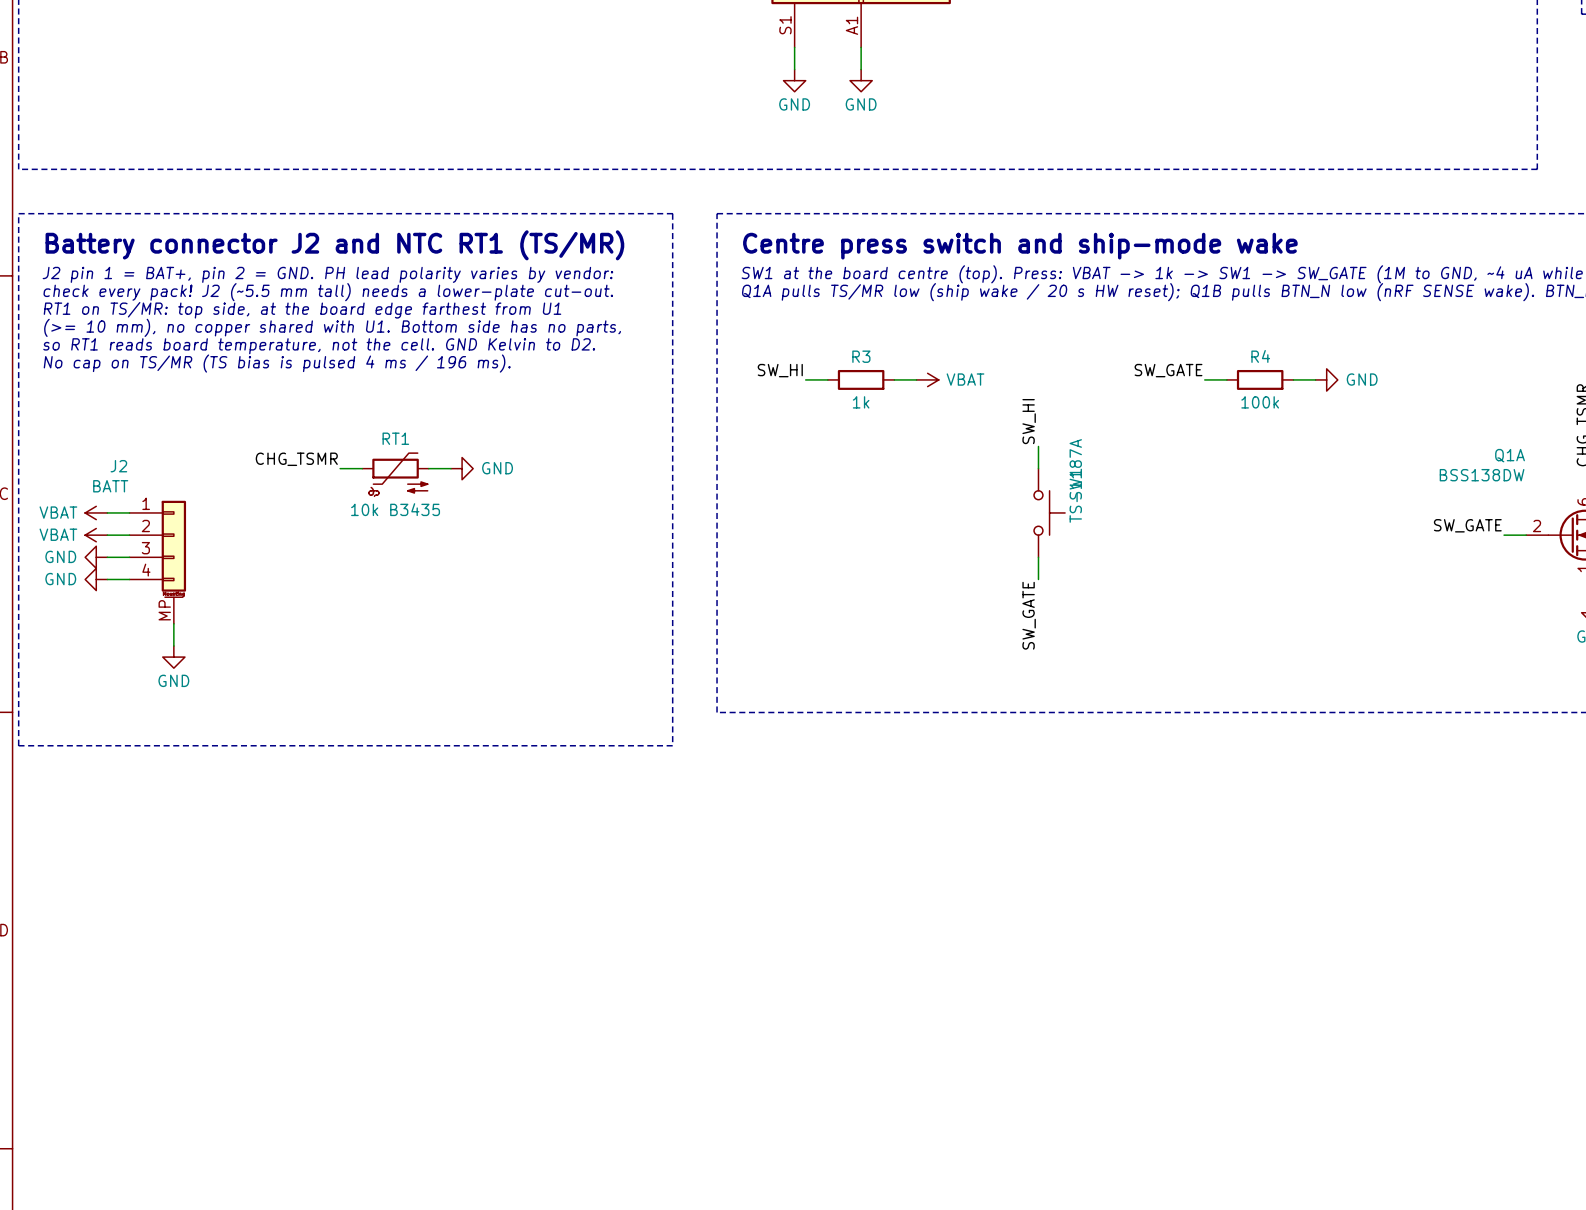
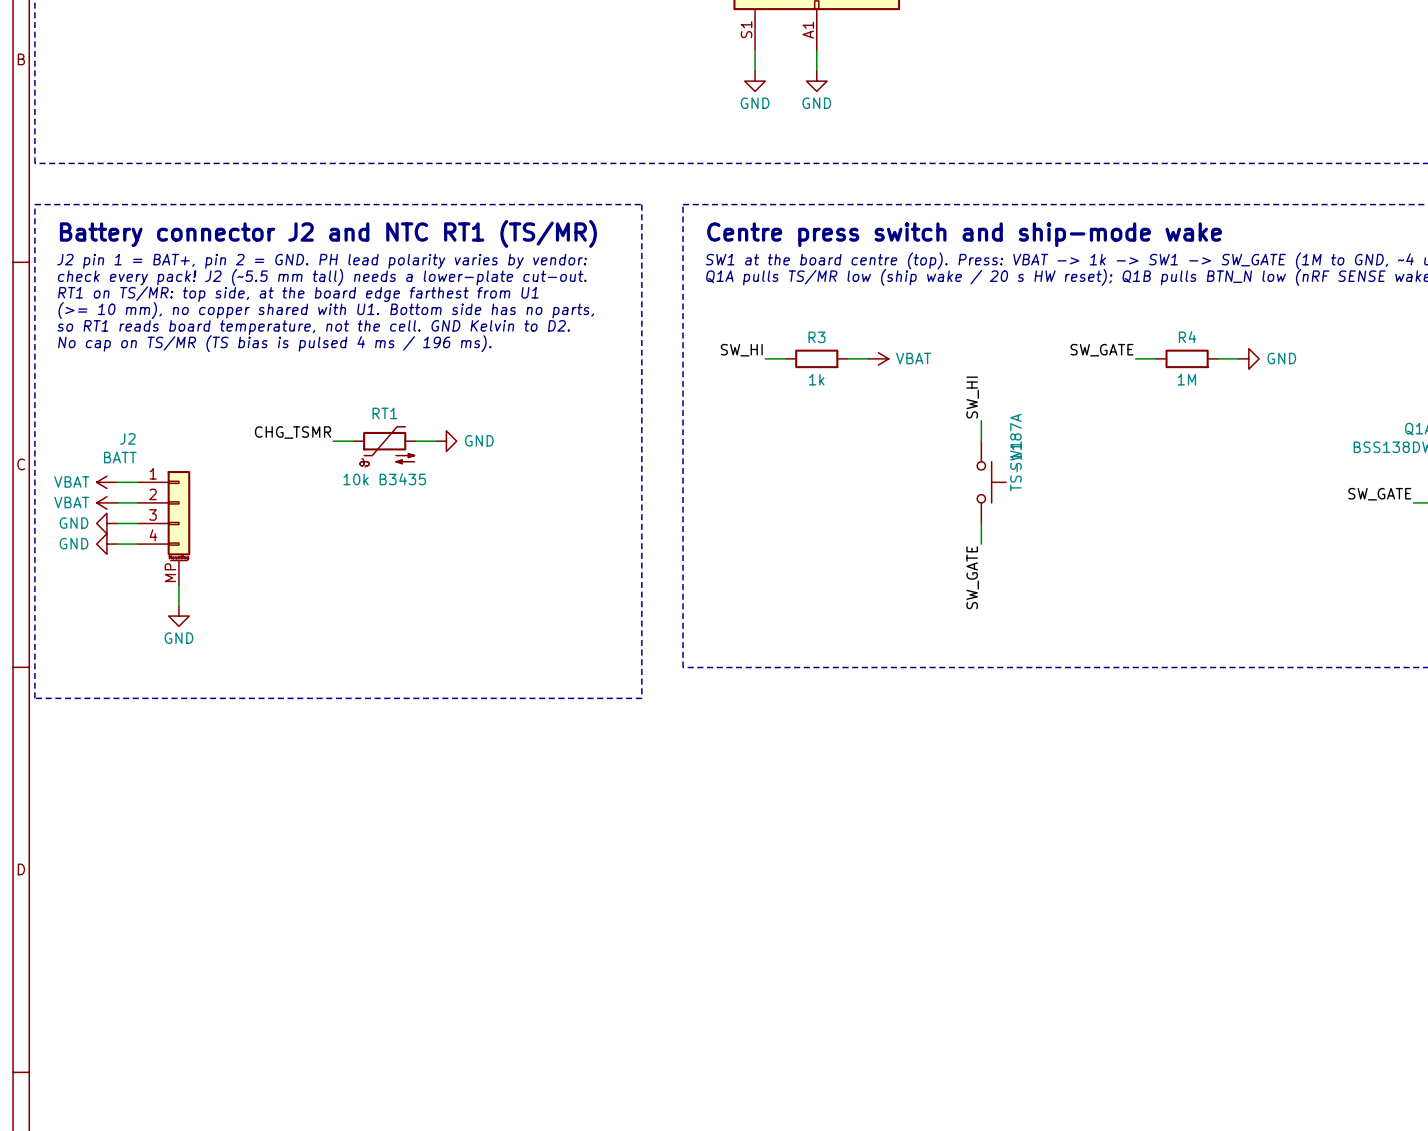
R4 value: 100k (1260, 402) -> 1M (1186, 379)

